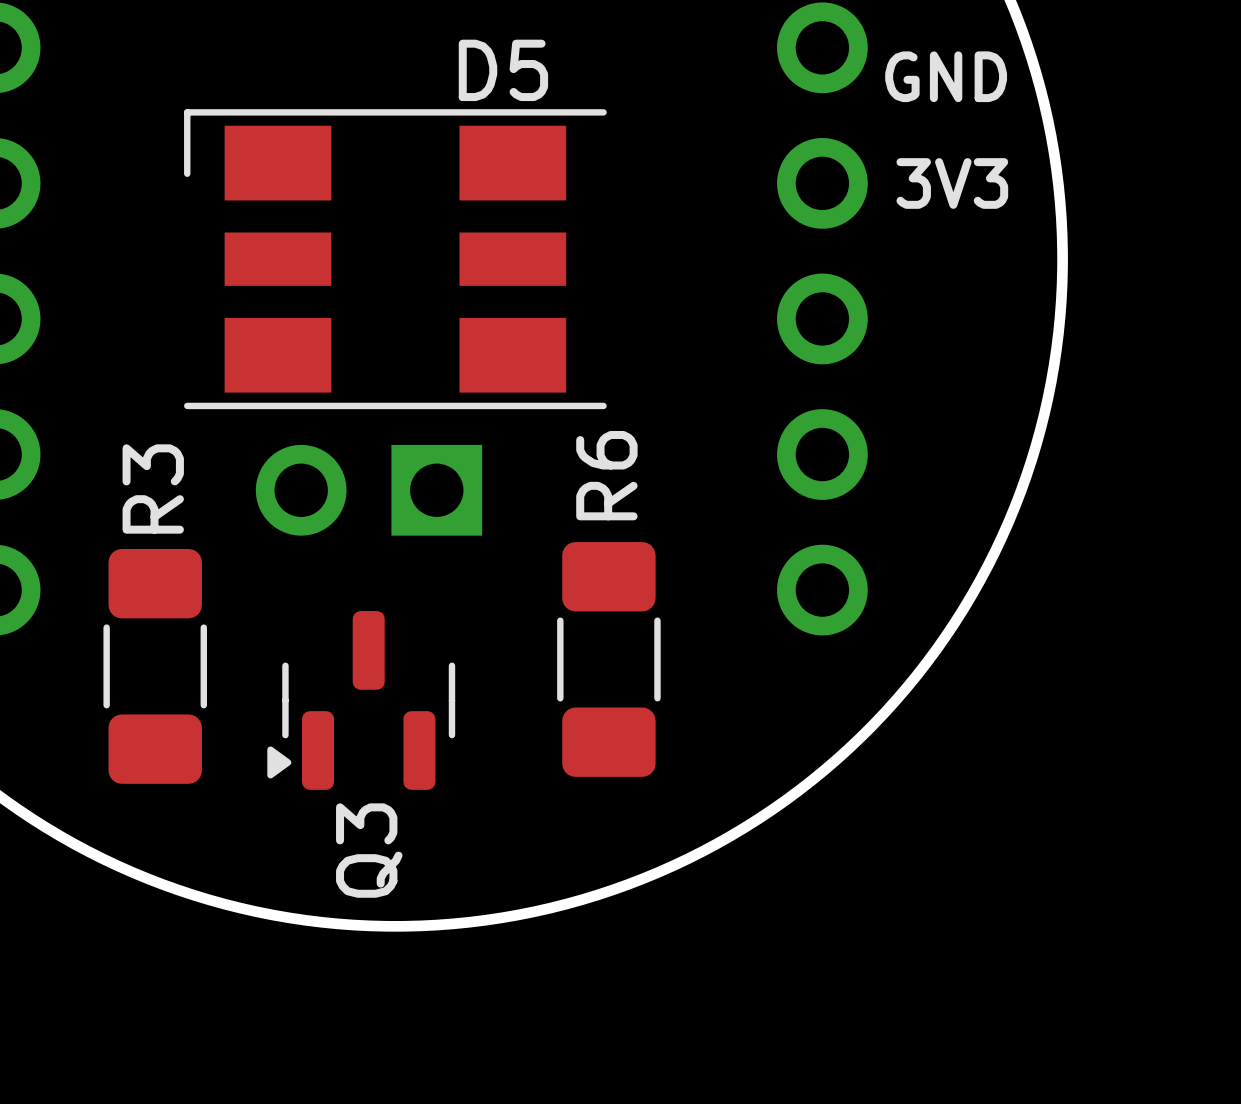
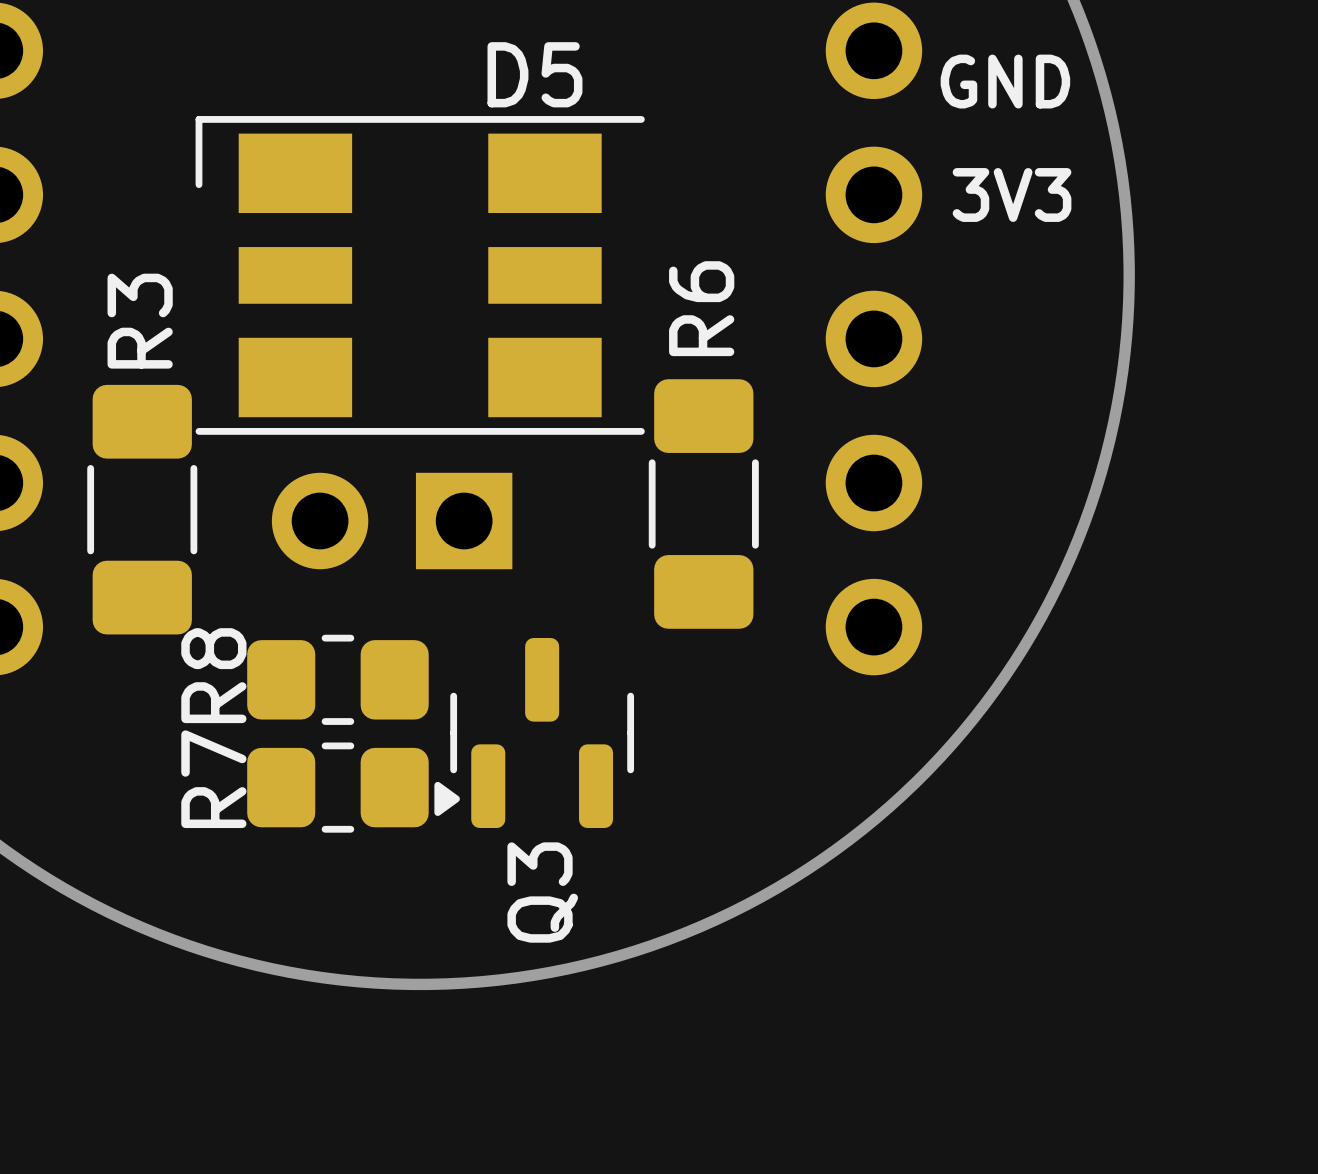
R8: none -> (337, 679)
R6 position: (608, 659) -> (703, 503)
R3 position: (155, 666) -> (142, 509)
Q3 position: (361, 700) -> (534, 733)
R7: none -> (337, 787)

